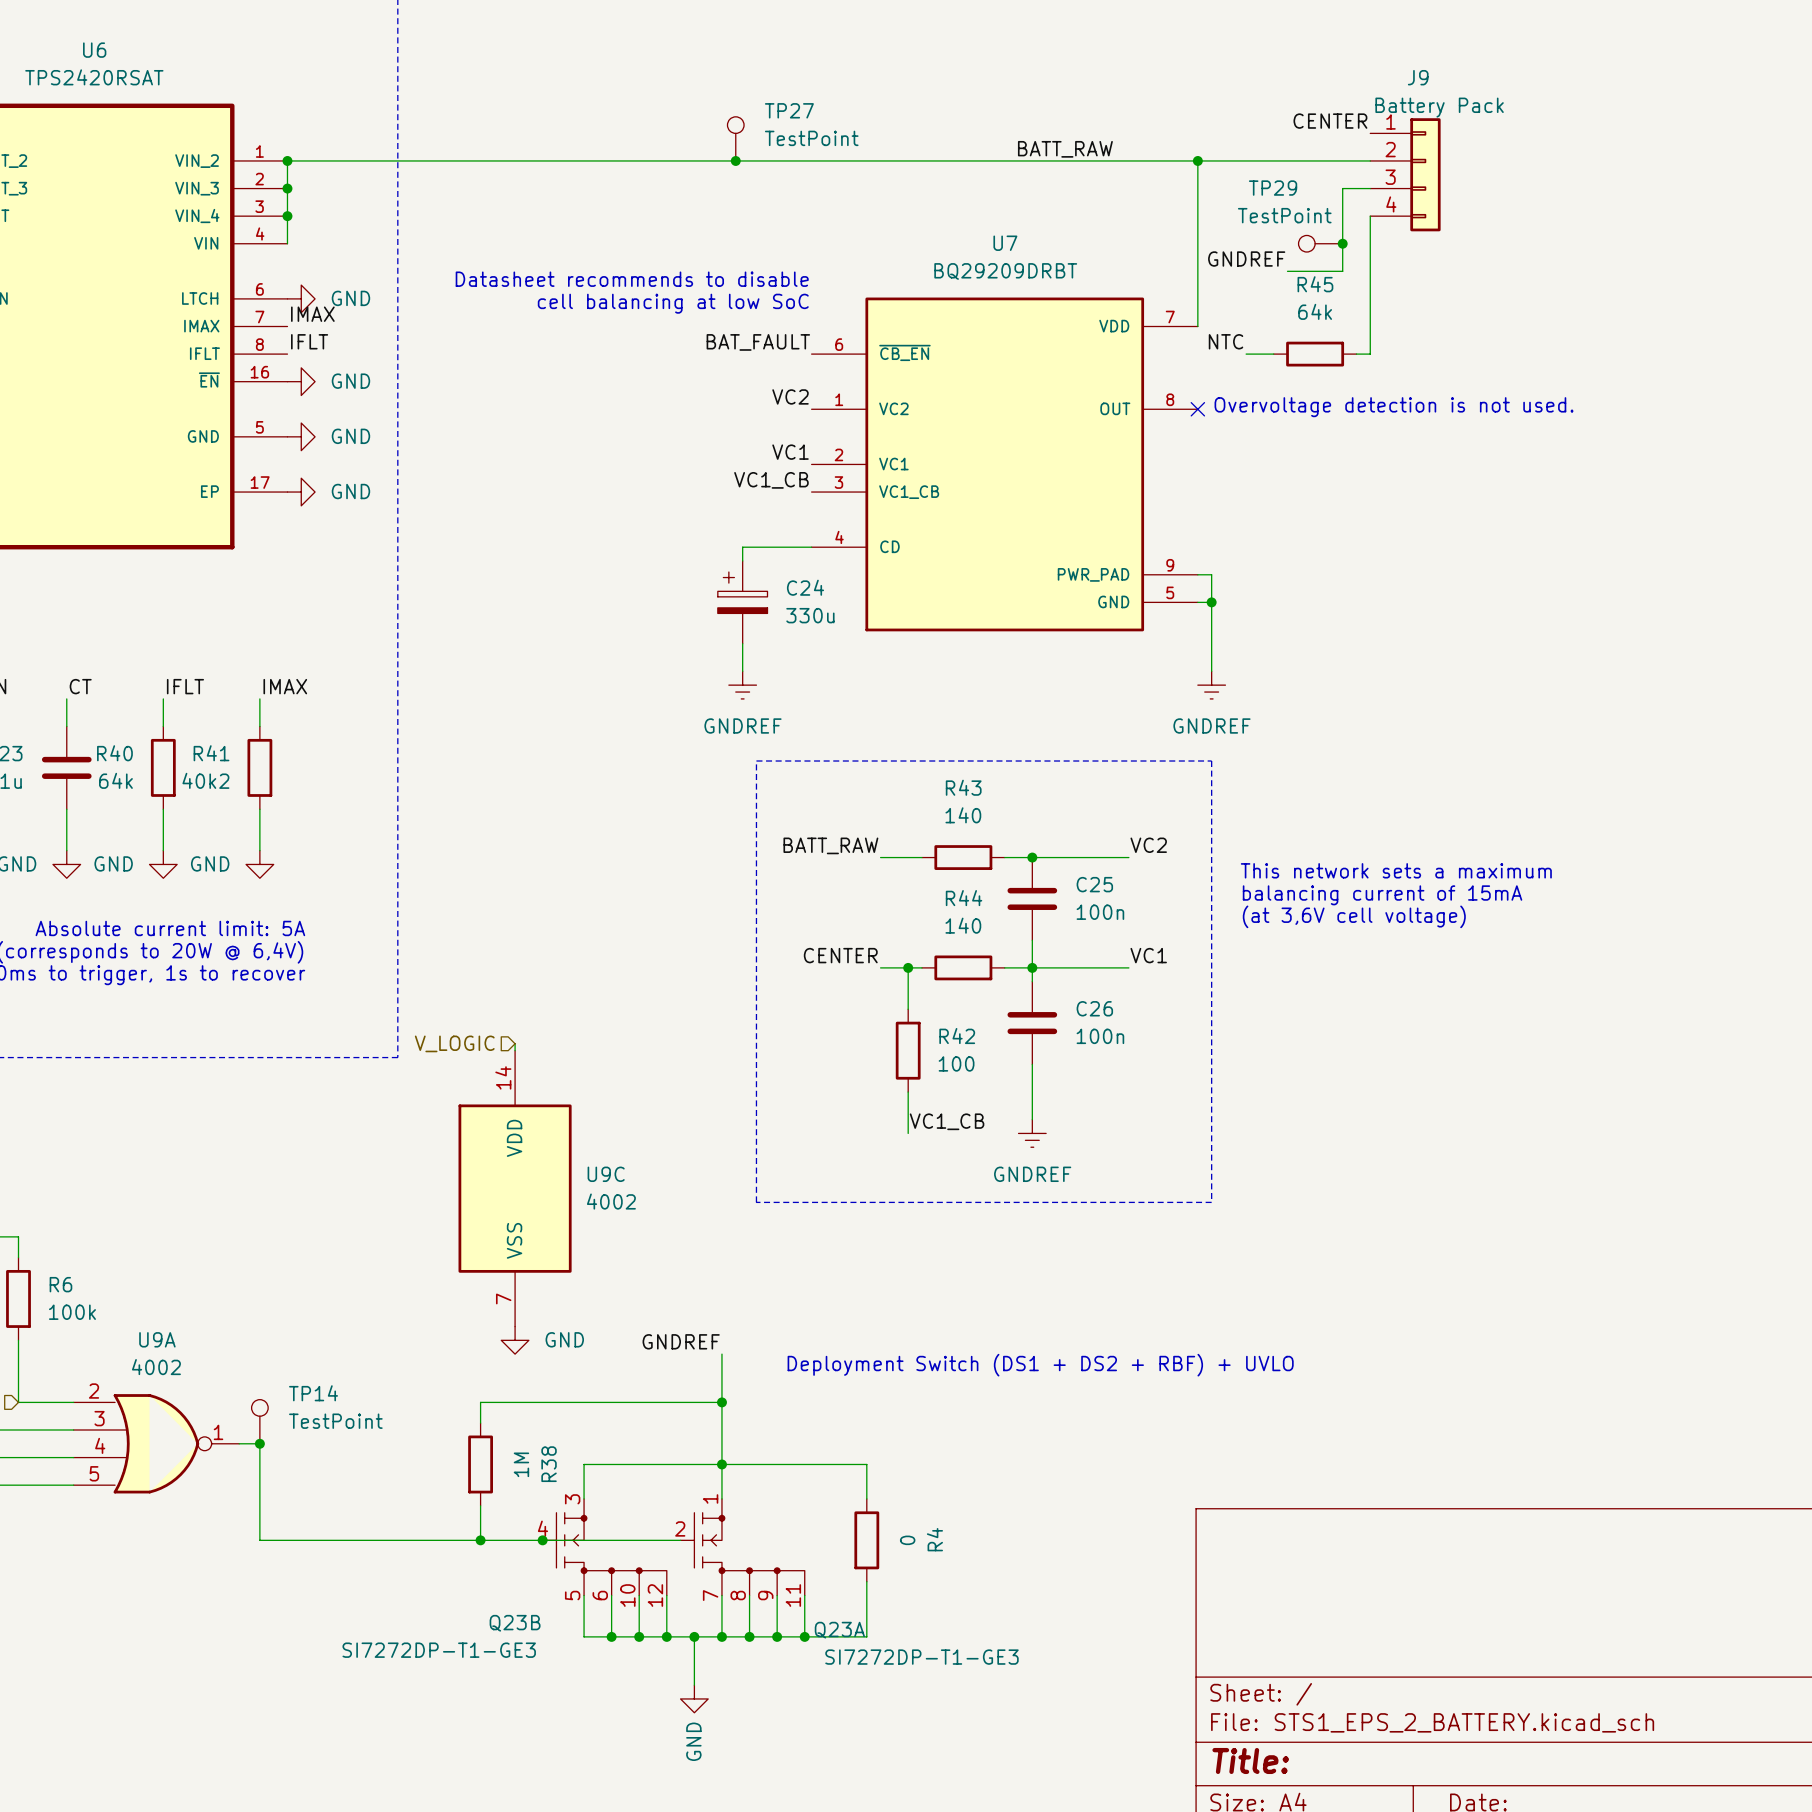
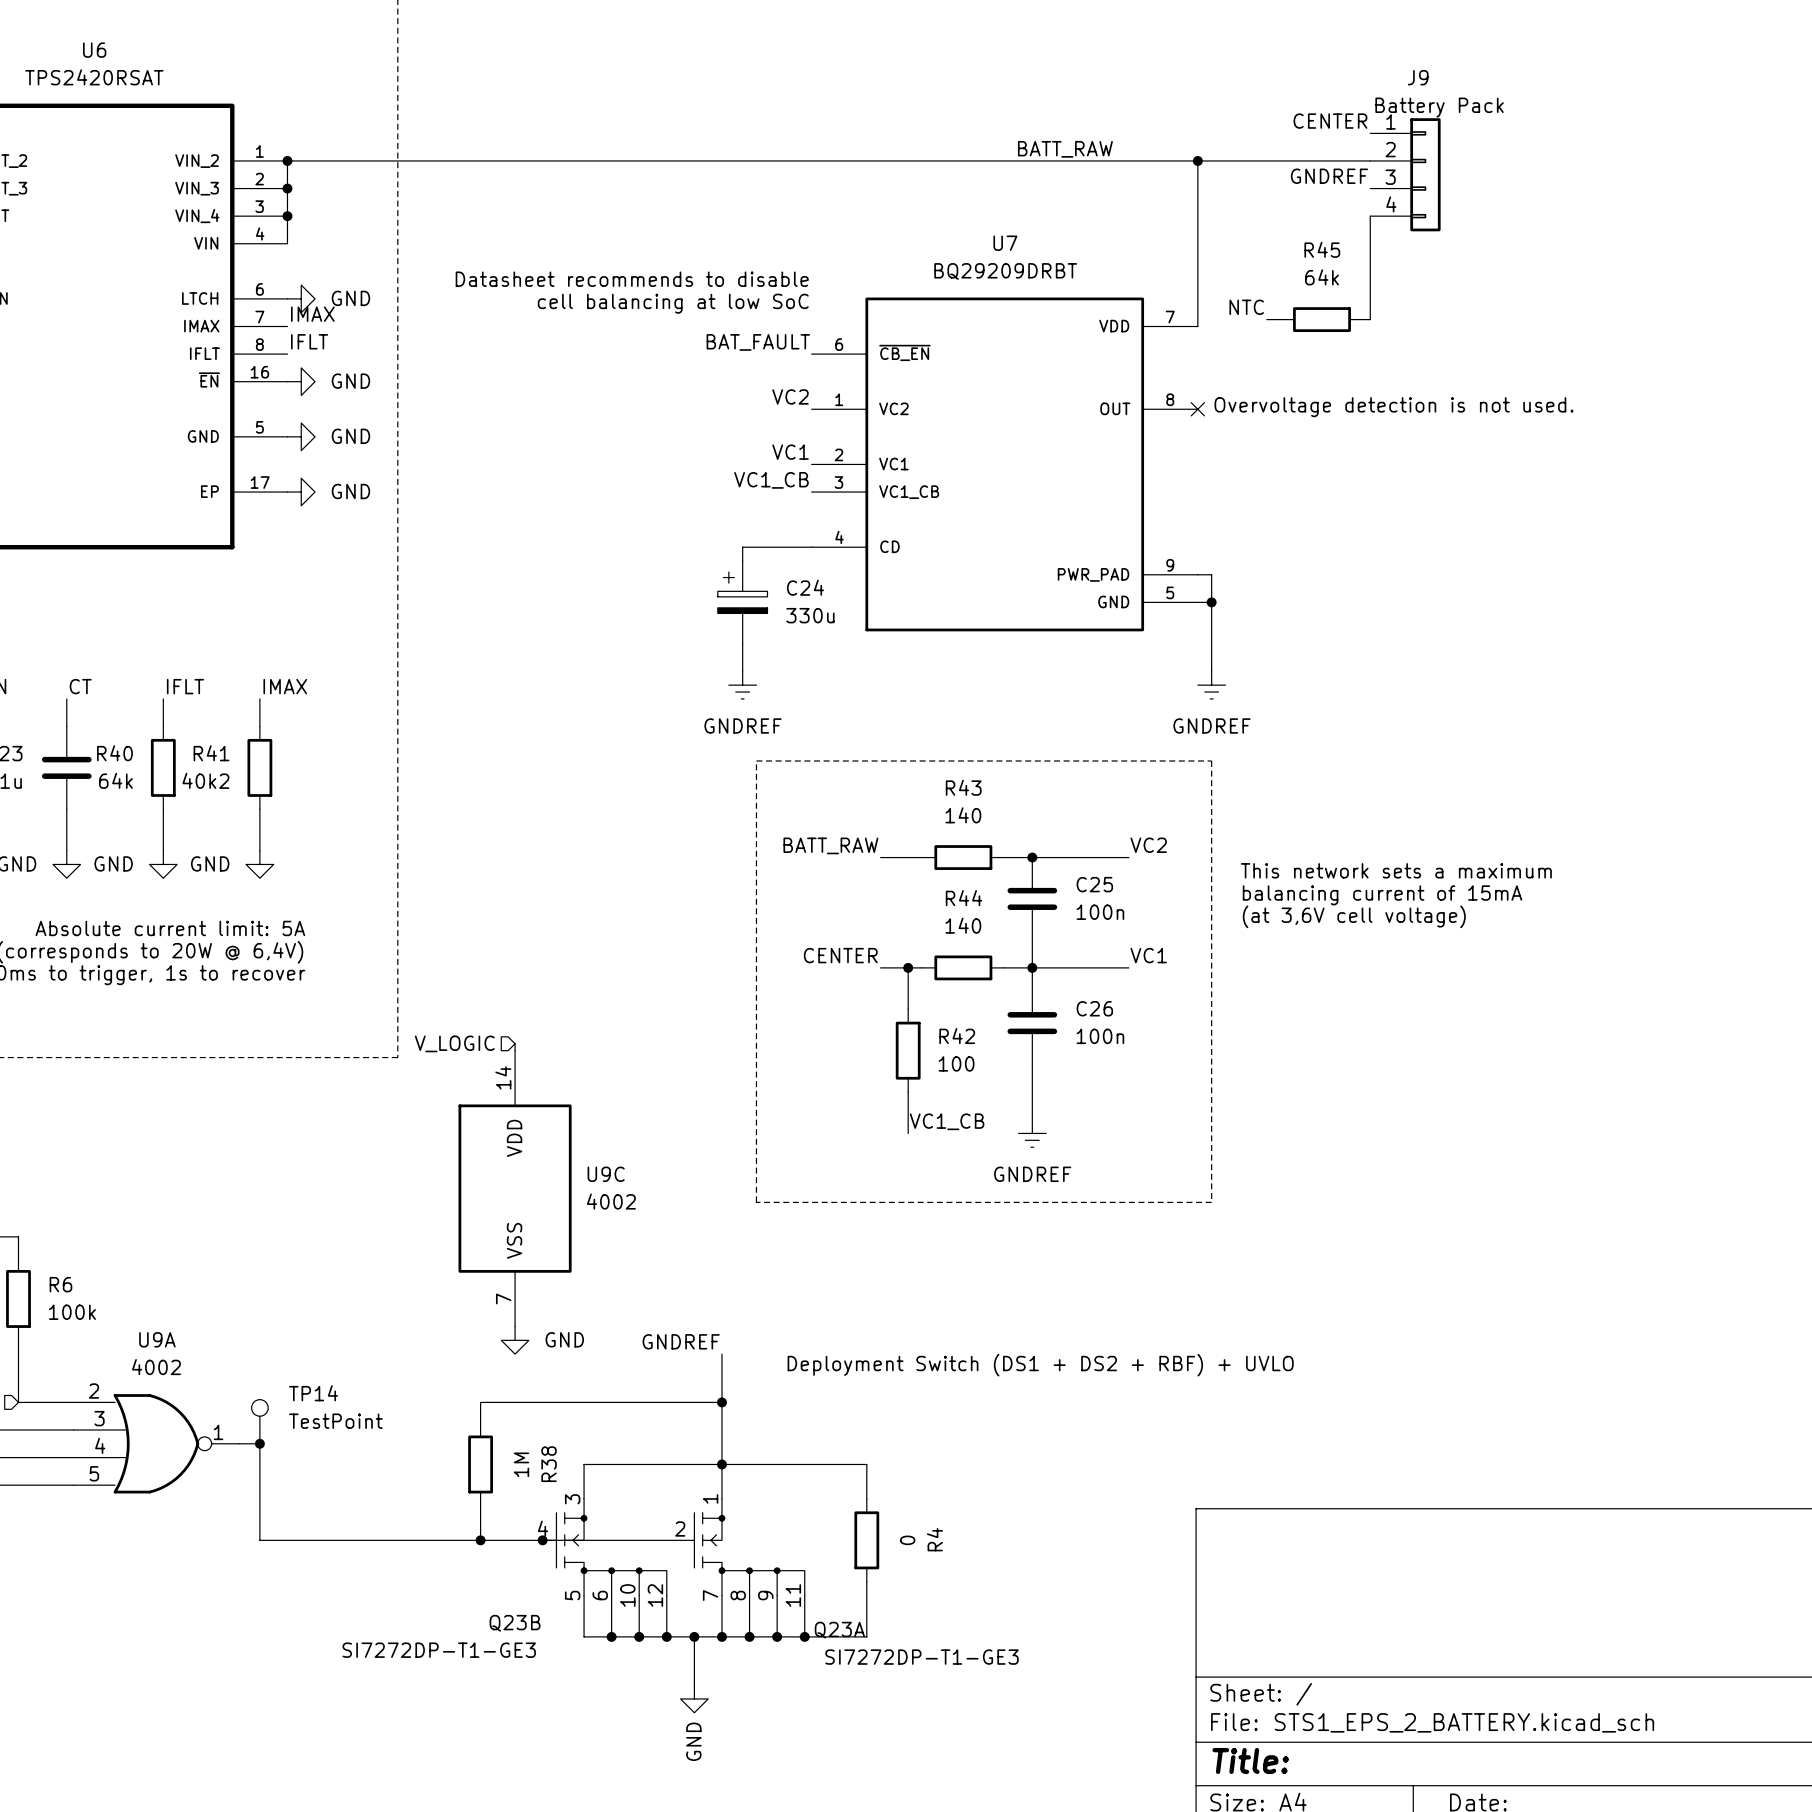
TP27: TestPoint (735, 138) -> none
junction: (735, 160) -> none
wire: (1370, 188) (1342, 188) (1342, 271) (1287, 271) -> none
TP29: TestPoint (1320, 243) -> none
junction: (1342, 243) -> none
label position: GNDREF (1246, 259) -> GNDREF (1329, 176)
wire: none -> (1266, 319) (1280, 319)
wire: (1370, 319) (1370, 354) (1356, 354) -> (1370, 319) (1363, 319)
label position: NTC (1225, 341) -> NTC (1246, 307)
wire: (1246, 354) (1273, 354) -> none
R45 position: (1315, 354) -> (1322, 319)

